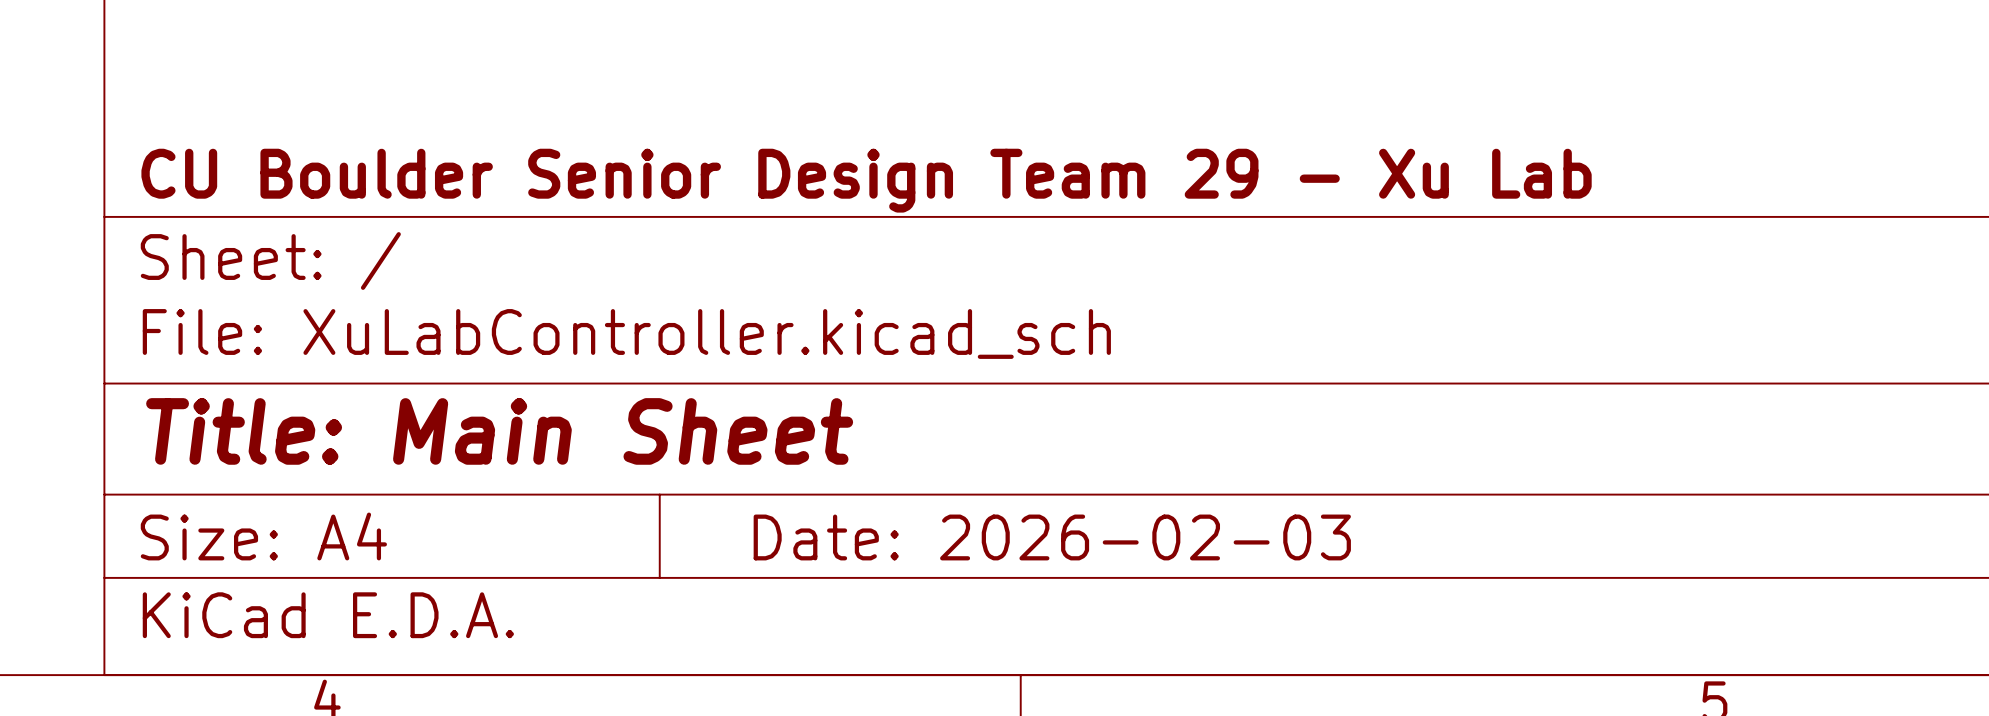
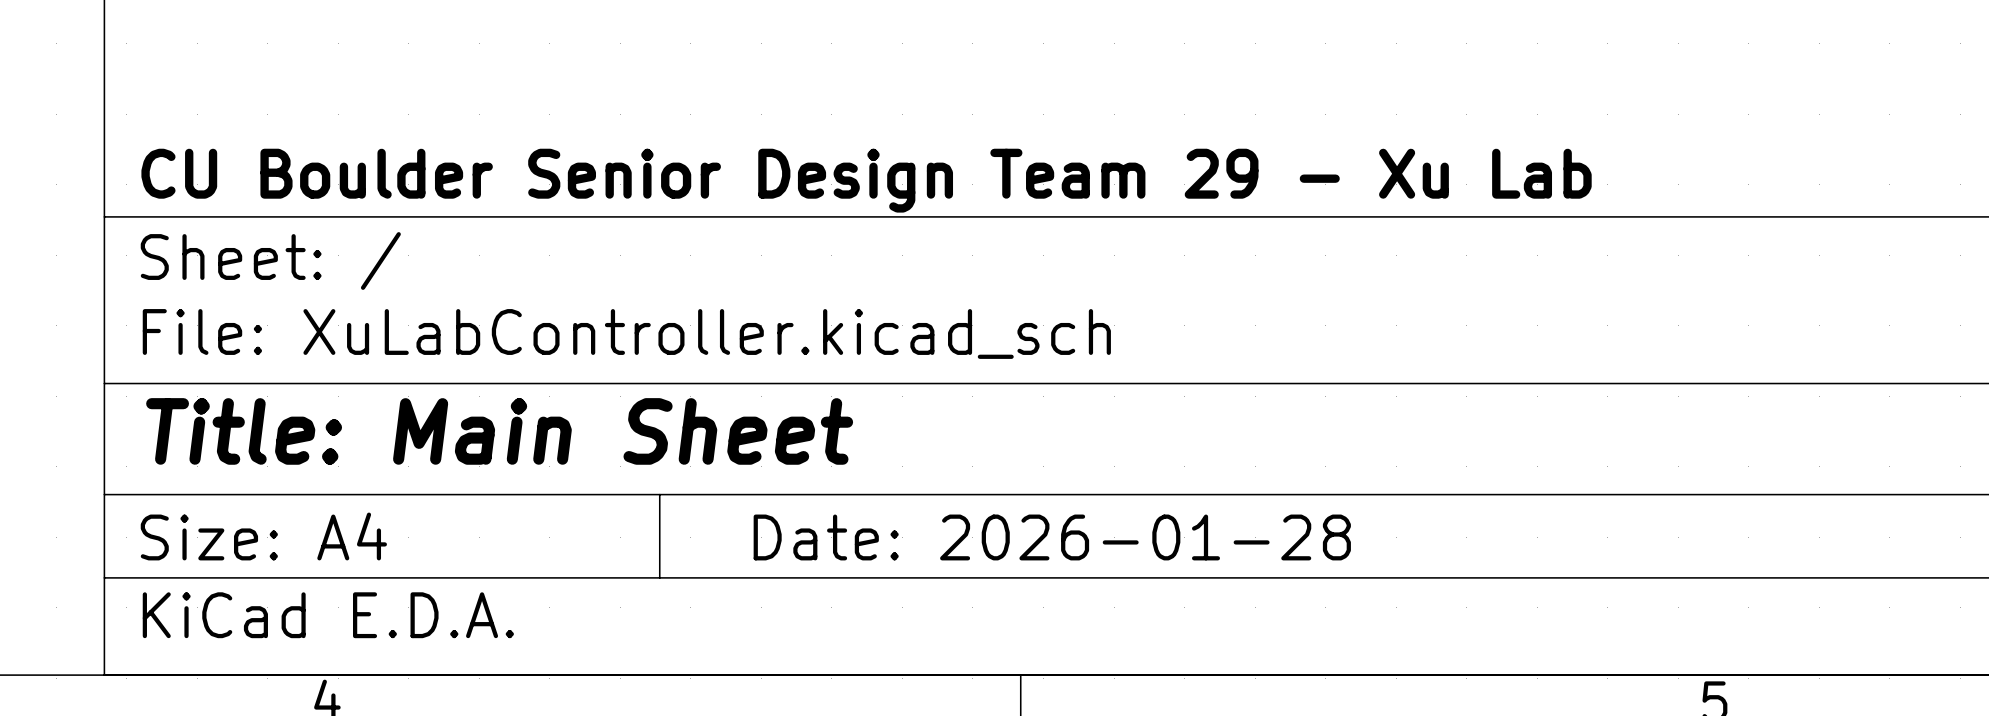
title block: Date: 2026-02-03 (1052, 537) -> Date: 2026-01-28 (1052, 537)

